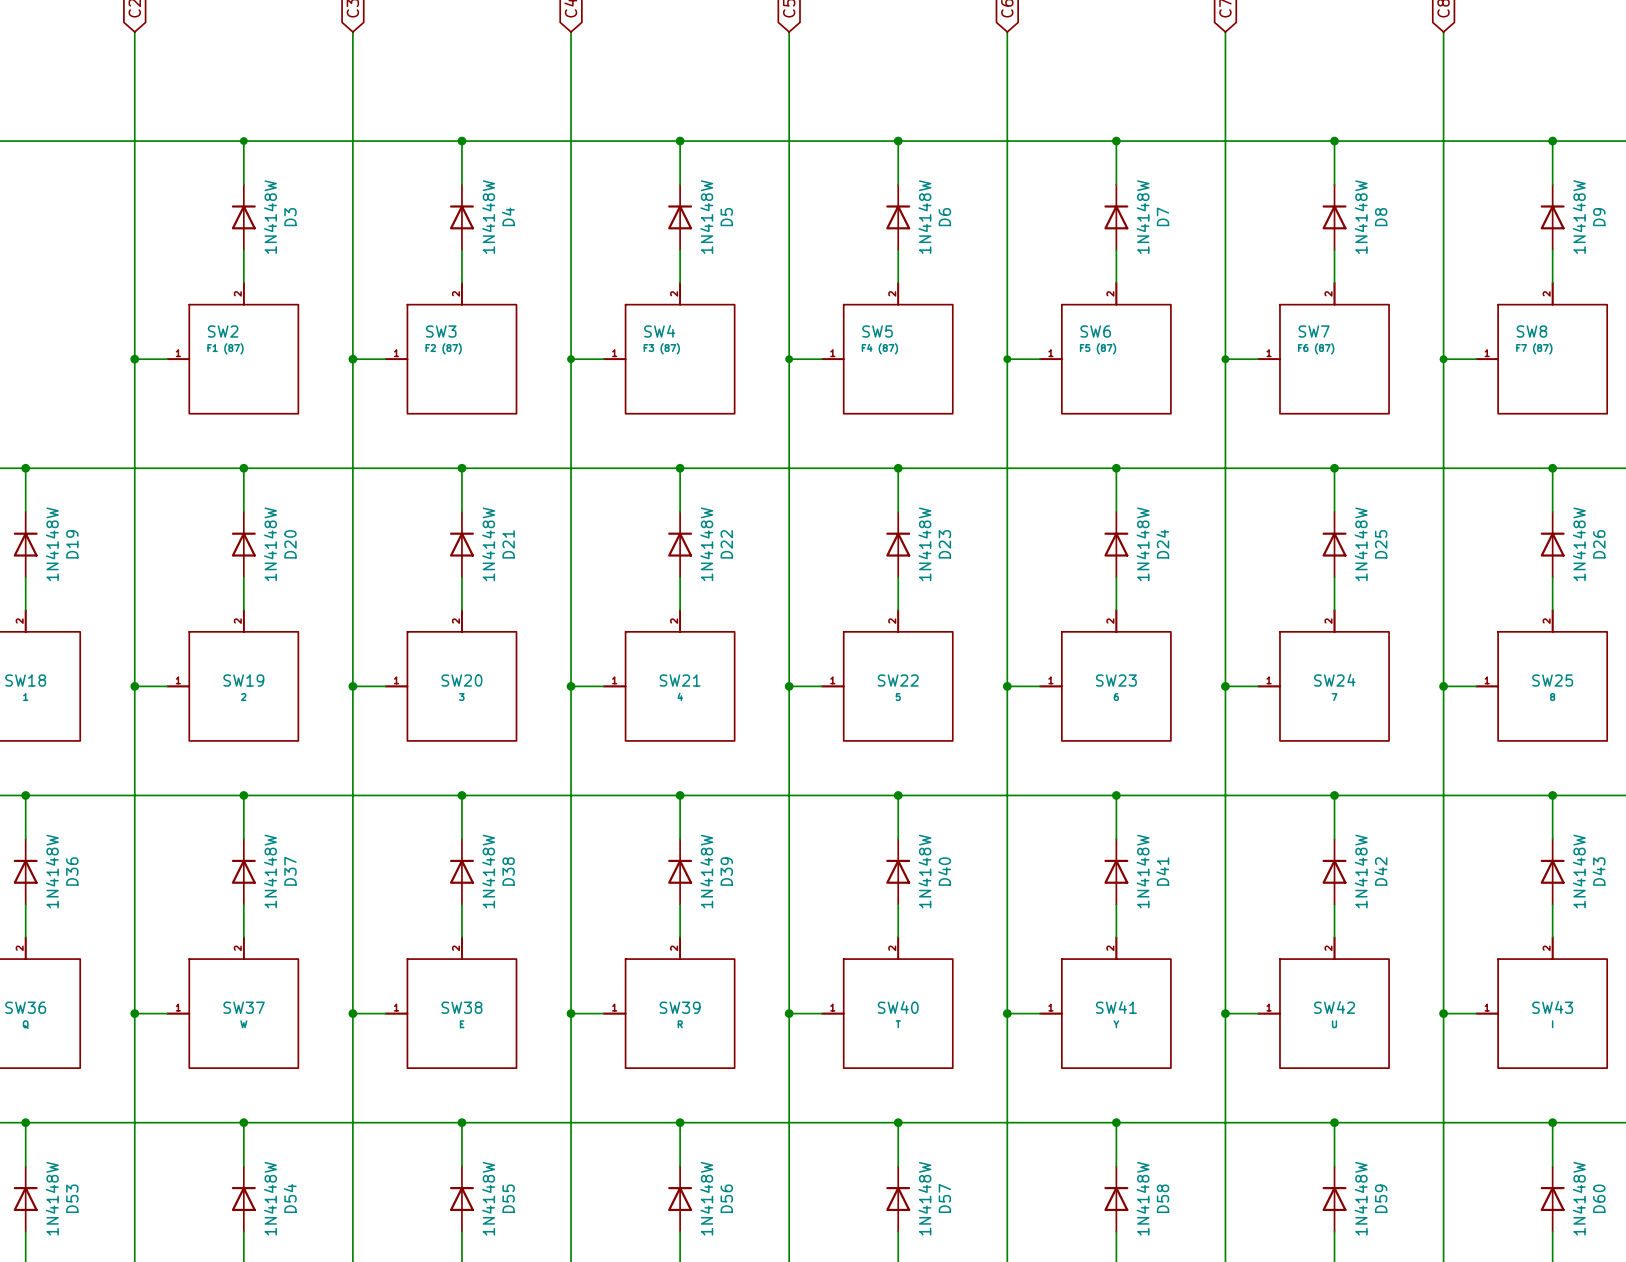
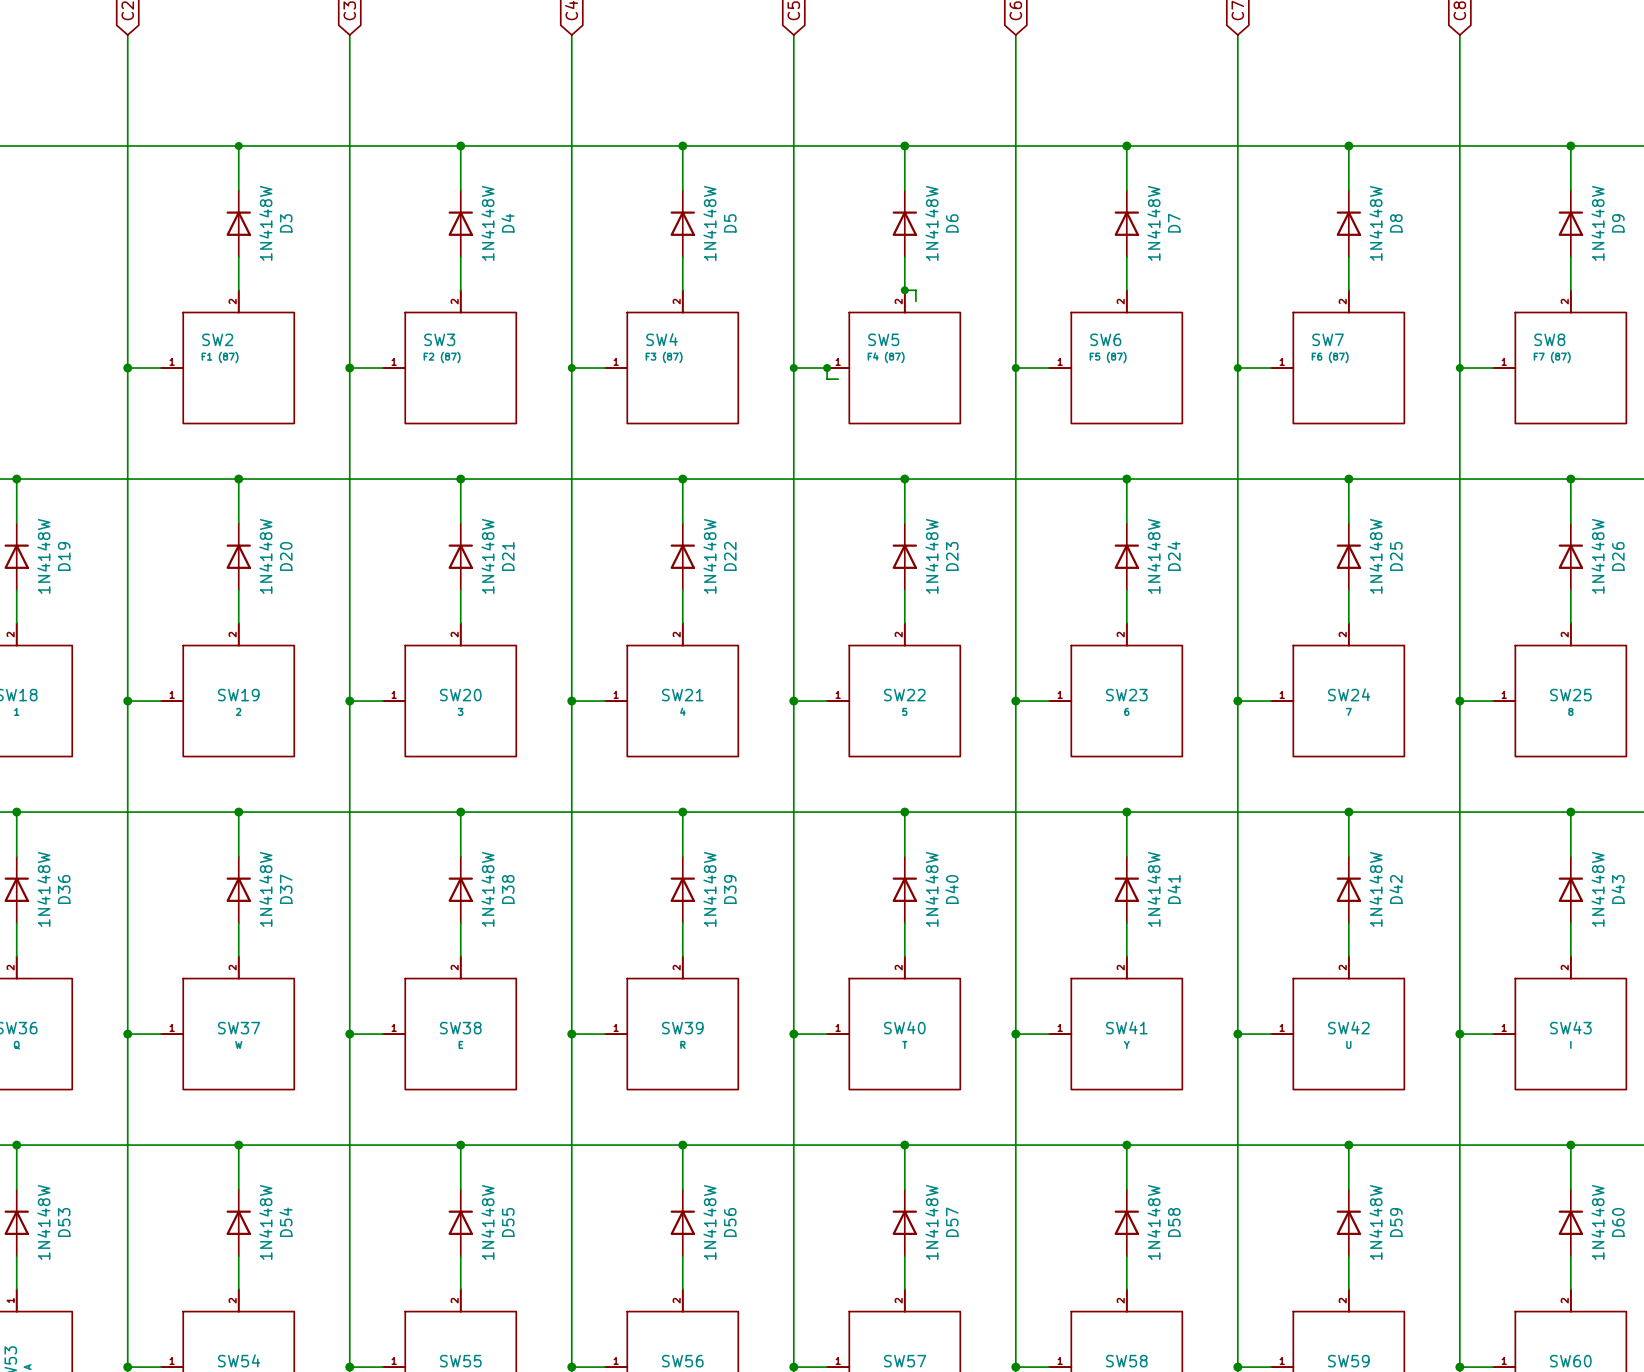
wire: none -> (904, 290) (915, 290) (915, 301)
junction: none -> (904, 290)
wire: none -> (827, 368) (827, 379) (838, 379)
junction: none -> (827, 368)

